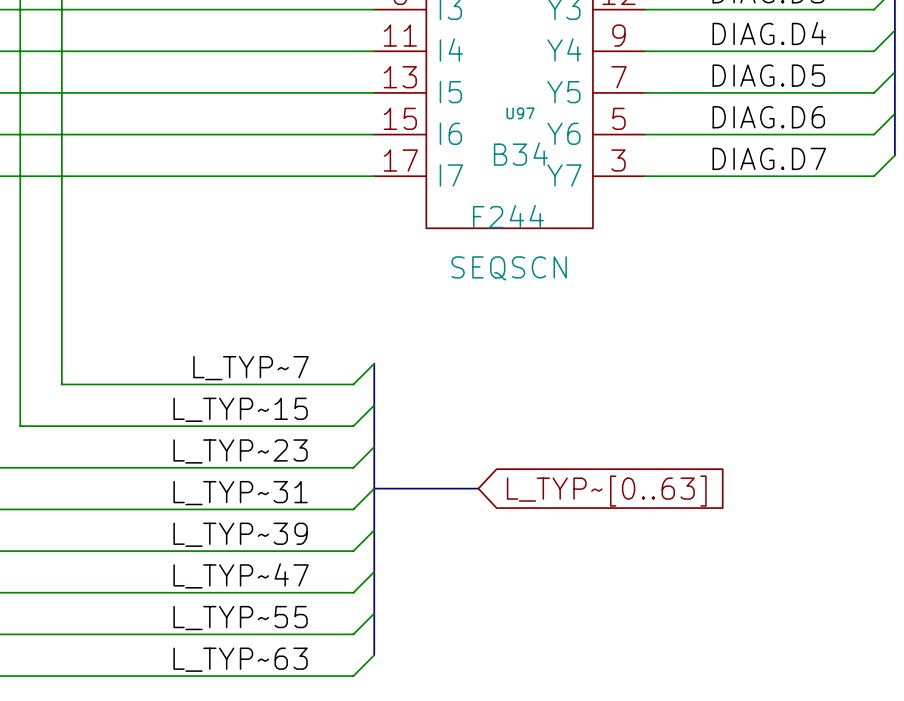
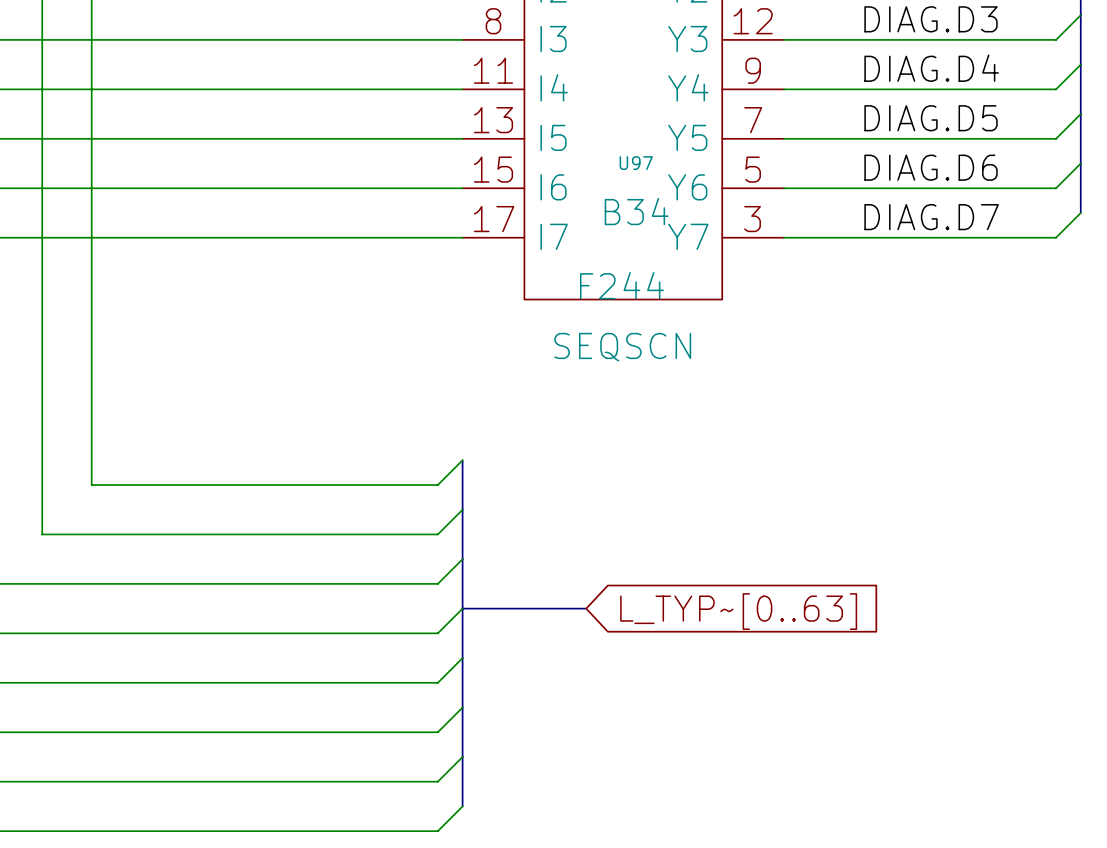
label: L_TYP~7 (250, 368) -> none
label: L_TYP~15 (240, 409) -> none
label: L_TYP~23 (240, 451) -> none
label: L_TYP~31 (240, 493) -> none
label: L_TYP~39 (240, 534) -> none
label: L_TYP~47 (241, 575) -> none
label: L_TYP~55 (240, 618) -> none
label: L_TYP~63 (240, 659) -> none

